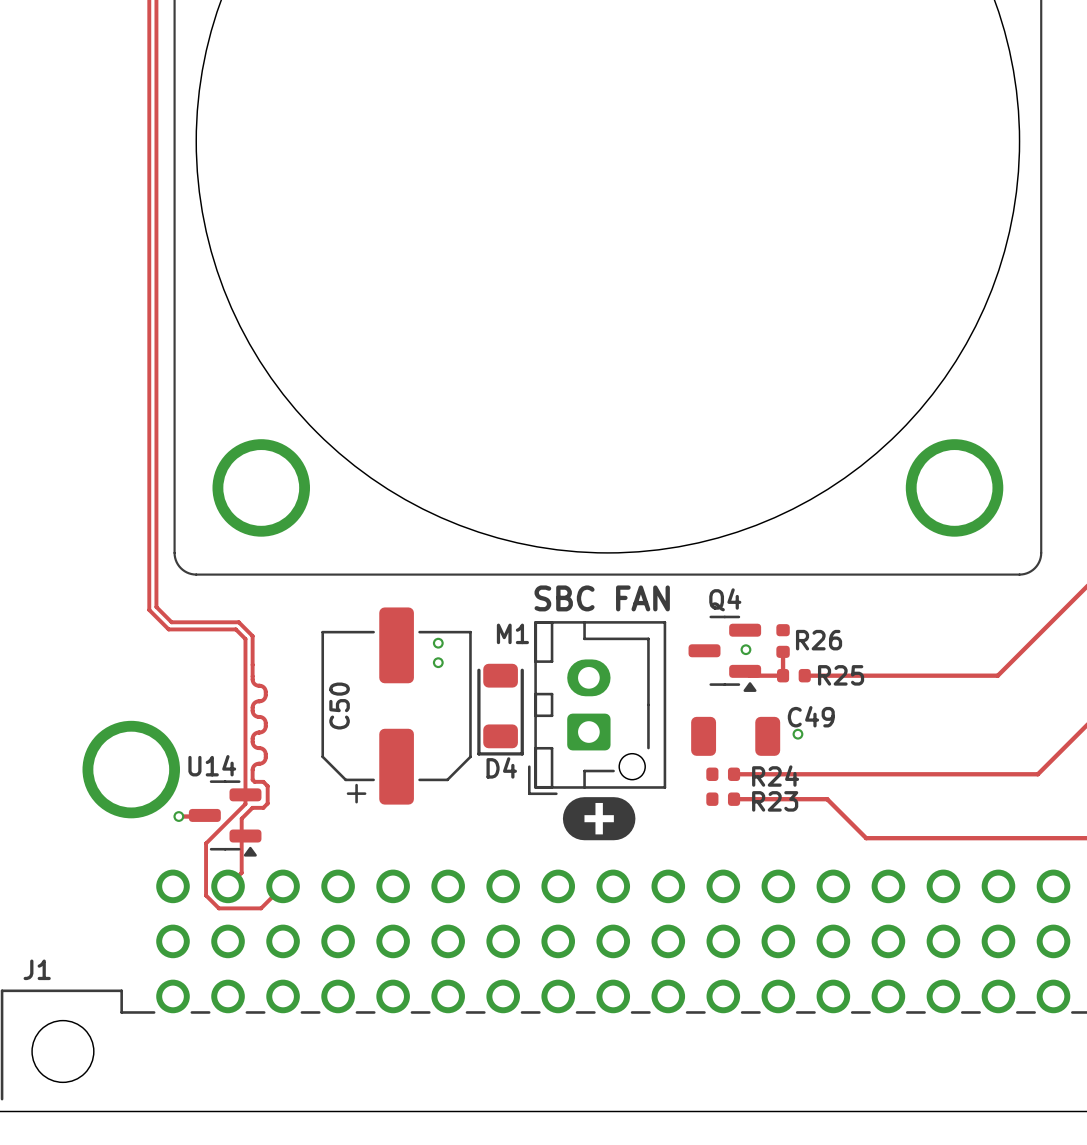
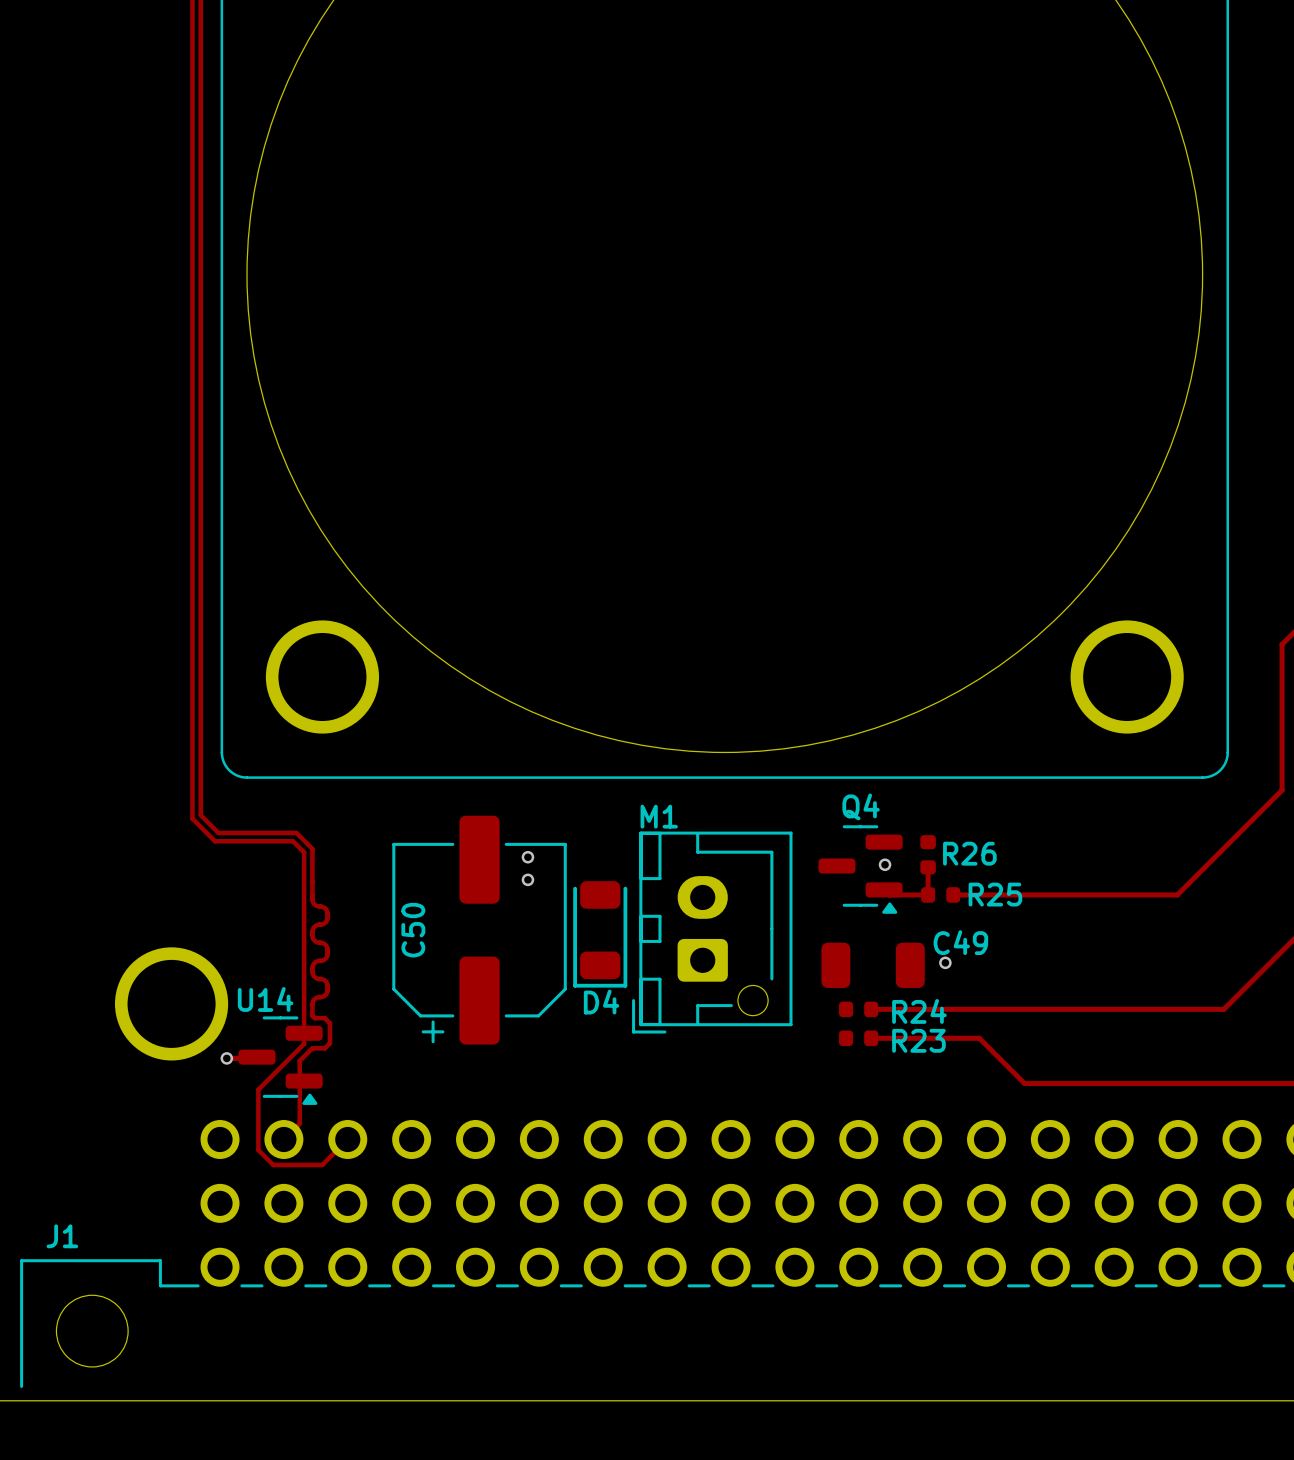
text: SBC FAN (602, 598) -> none
M1 name position: M1 (512, 633) -> M1 (659, 816)
drawing: [562, 797, 636, 841] -> none

